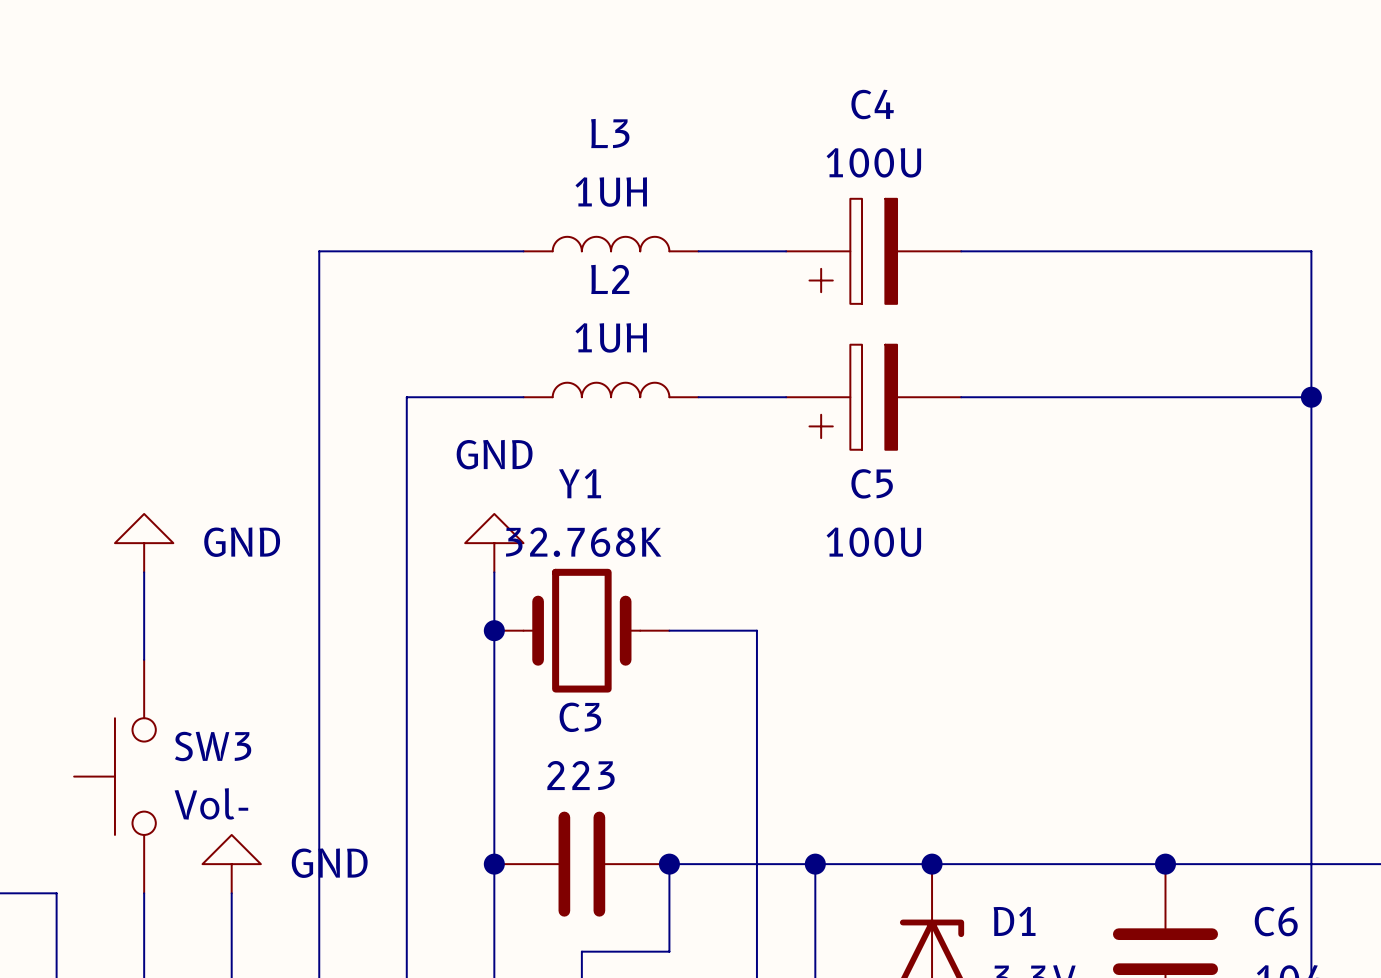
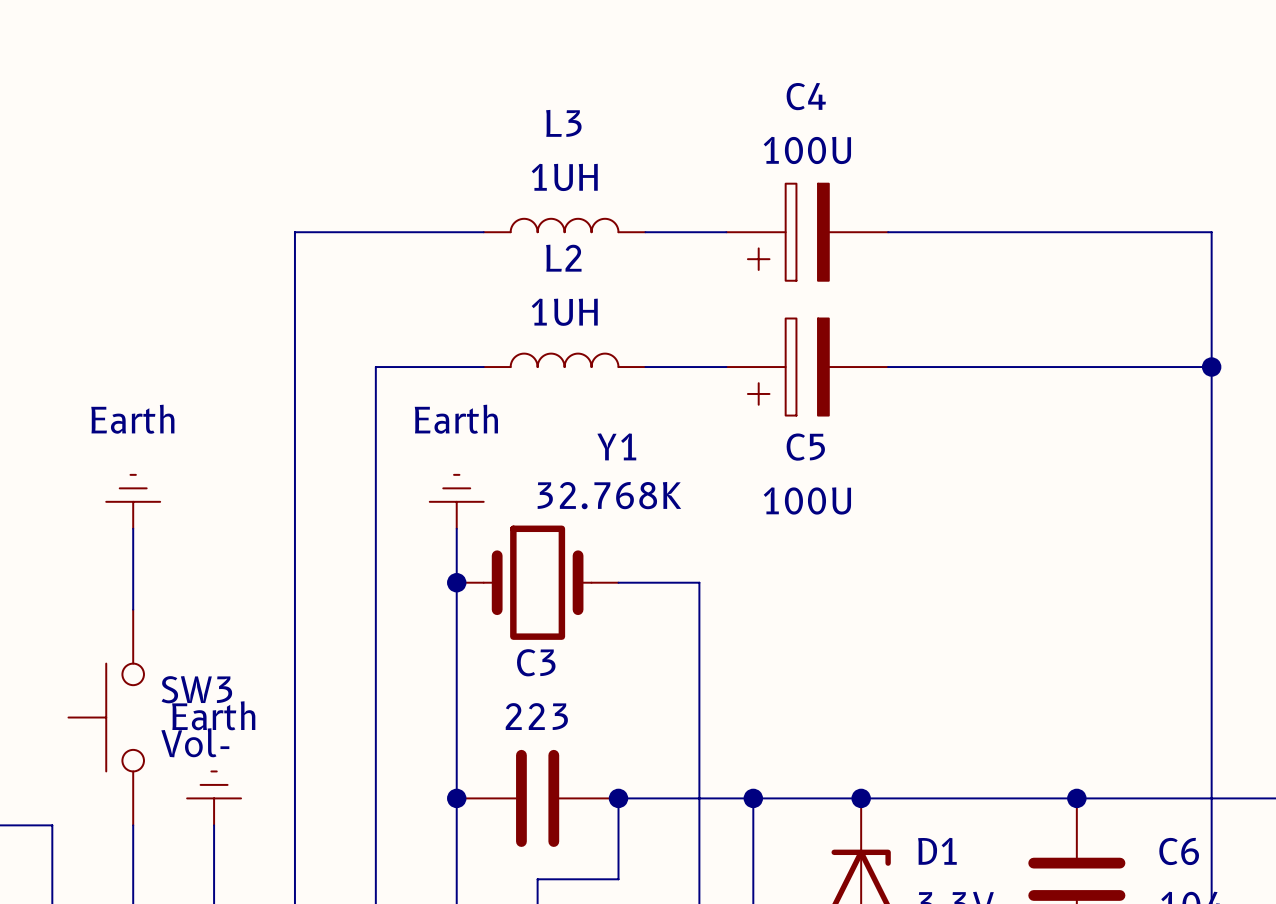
Y1 name position: Y1 (580, 483) -> Y1 (616, 446)
Y1 value position: 32.768K (583, 542) -> 32.768K (609, 495)
power symbol: GND (144, 543) -> Earth (133, 501)
power symbol: GND (494, 543) -> Earth (456, 501)
power symbol: GND (231, 864) -> Earth (214, 798)

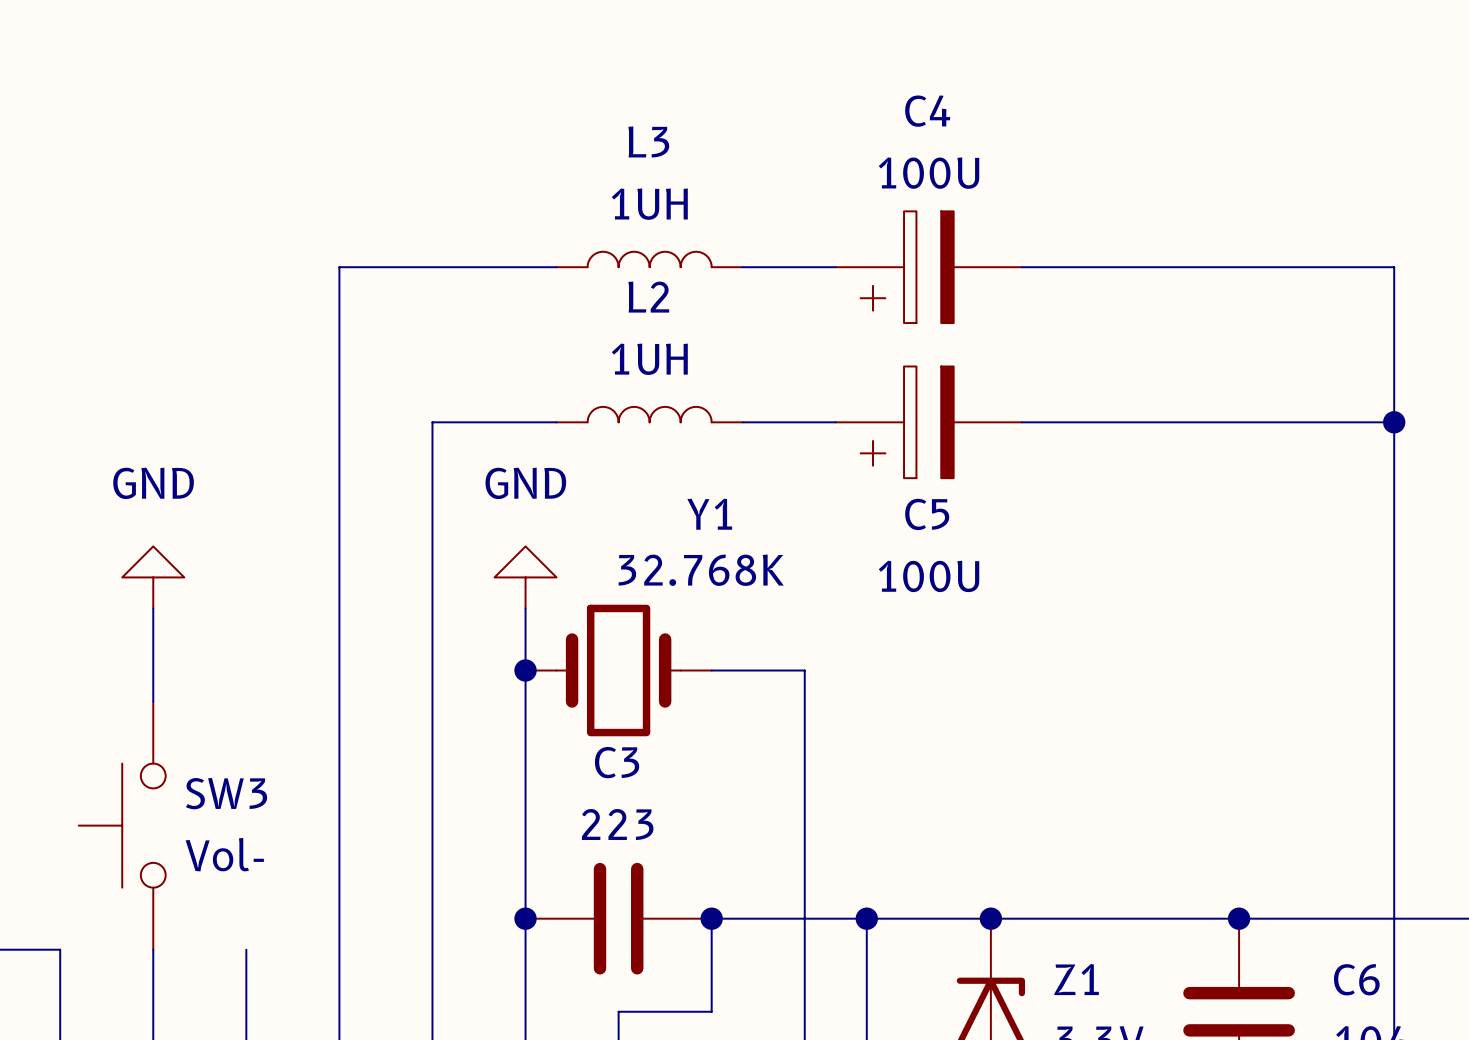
power symbol: Earth (133, 501) -> GND (153, 577)
power symbol: Earth (456, 501) -> GND (525, 577)
power symbol: Earth (214, 798) -> none
D1 name: D1 (937, 851) -> Z1 (1076, 979)

